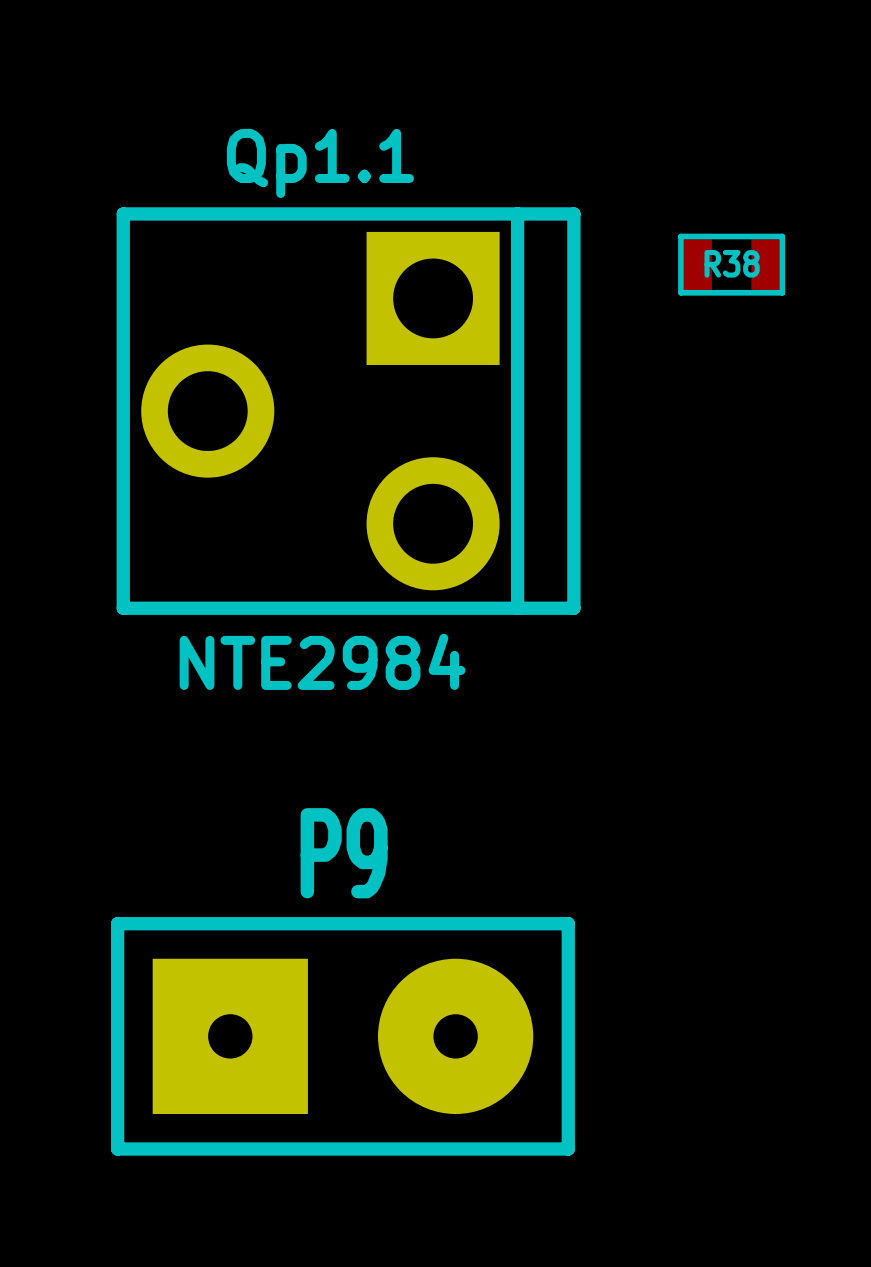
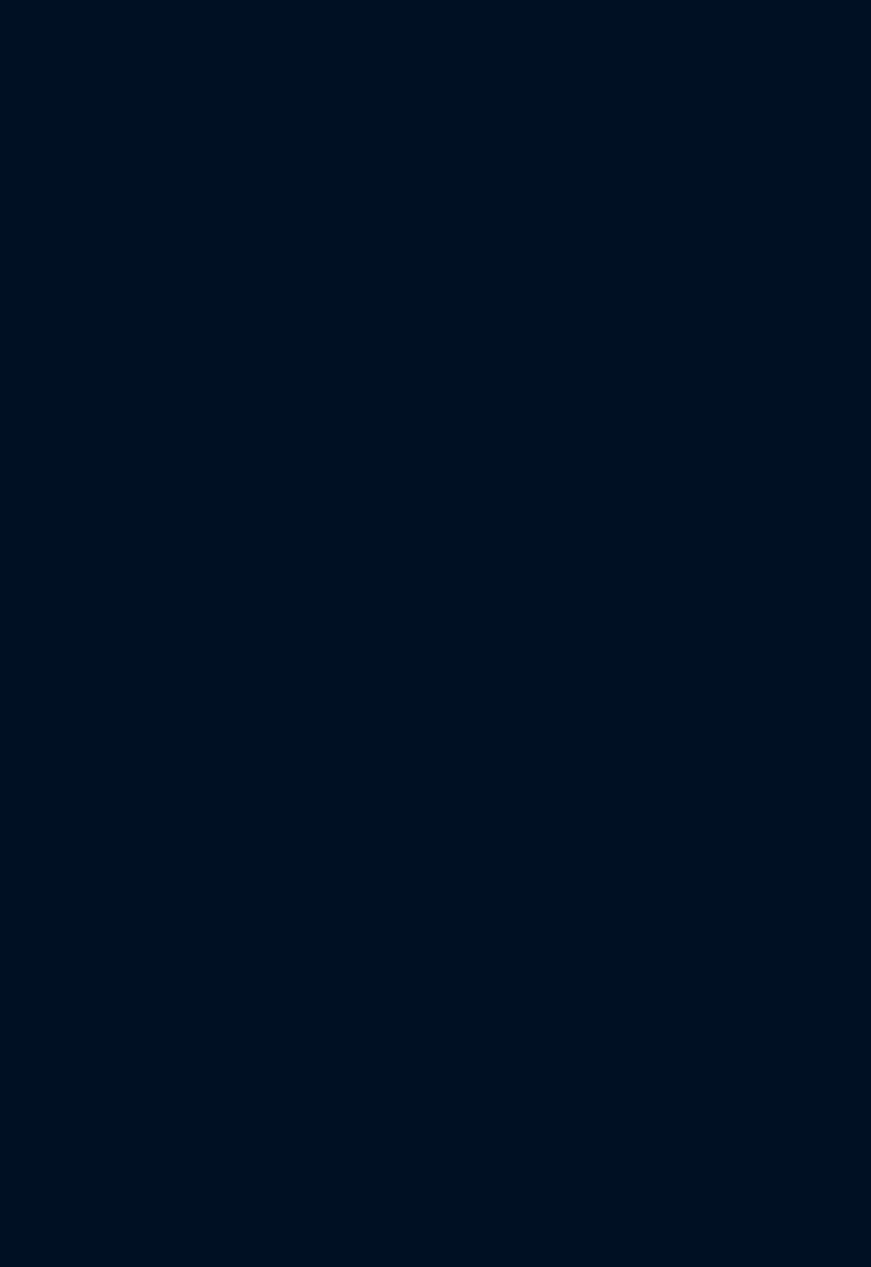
R38: (731, 264) -> none
Qp1.1: NTE2984 (348, 411) -> none
P9: (342, 1036) -> none

